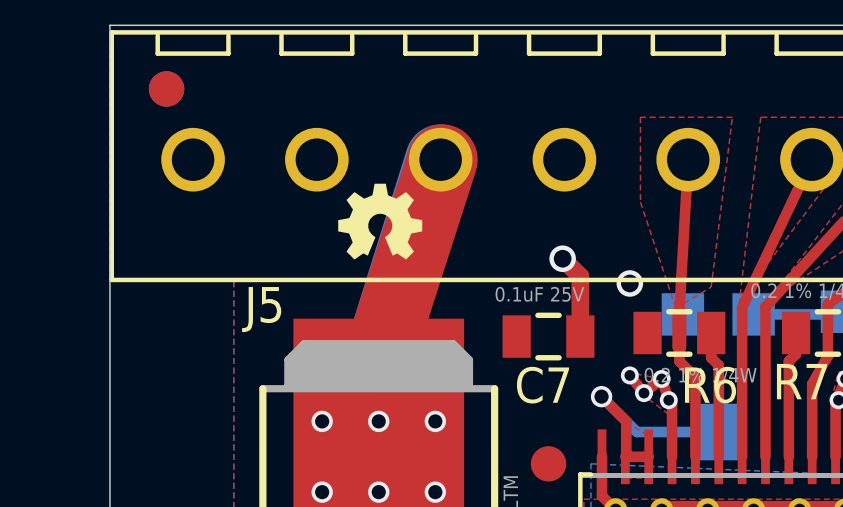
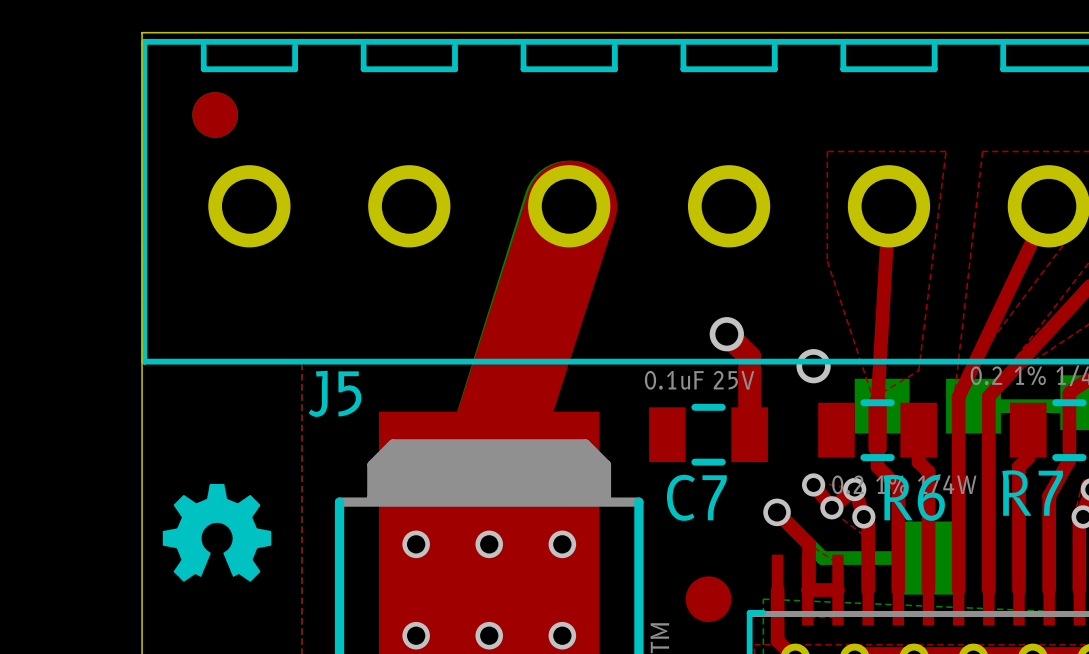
drawing position: (380, 221) -> (217, 532)

